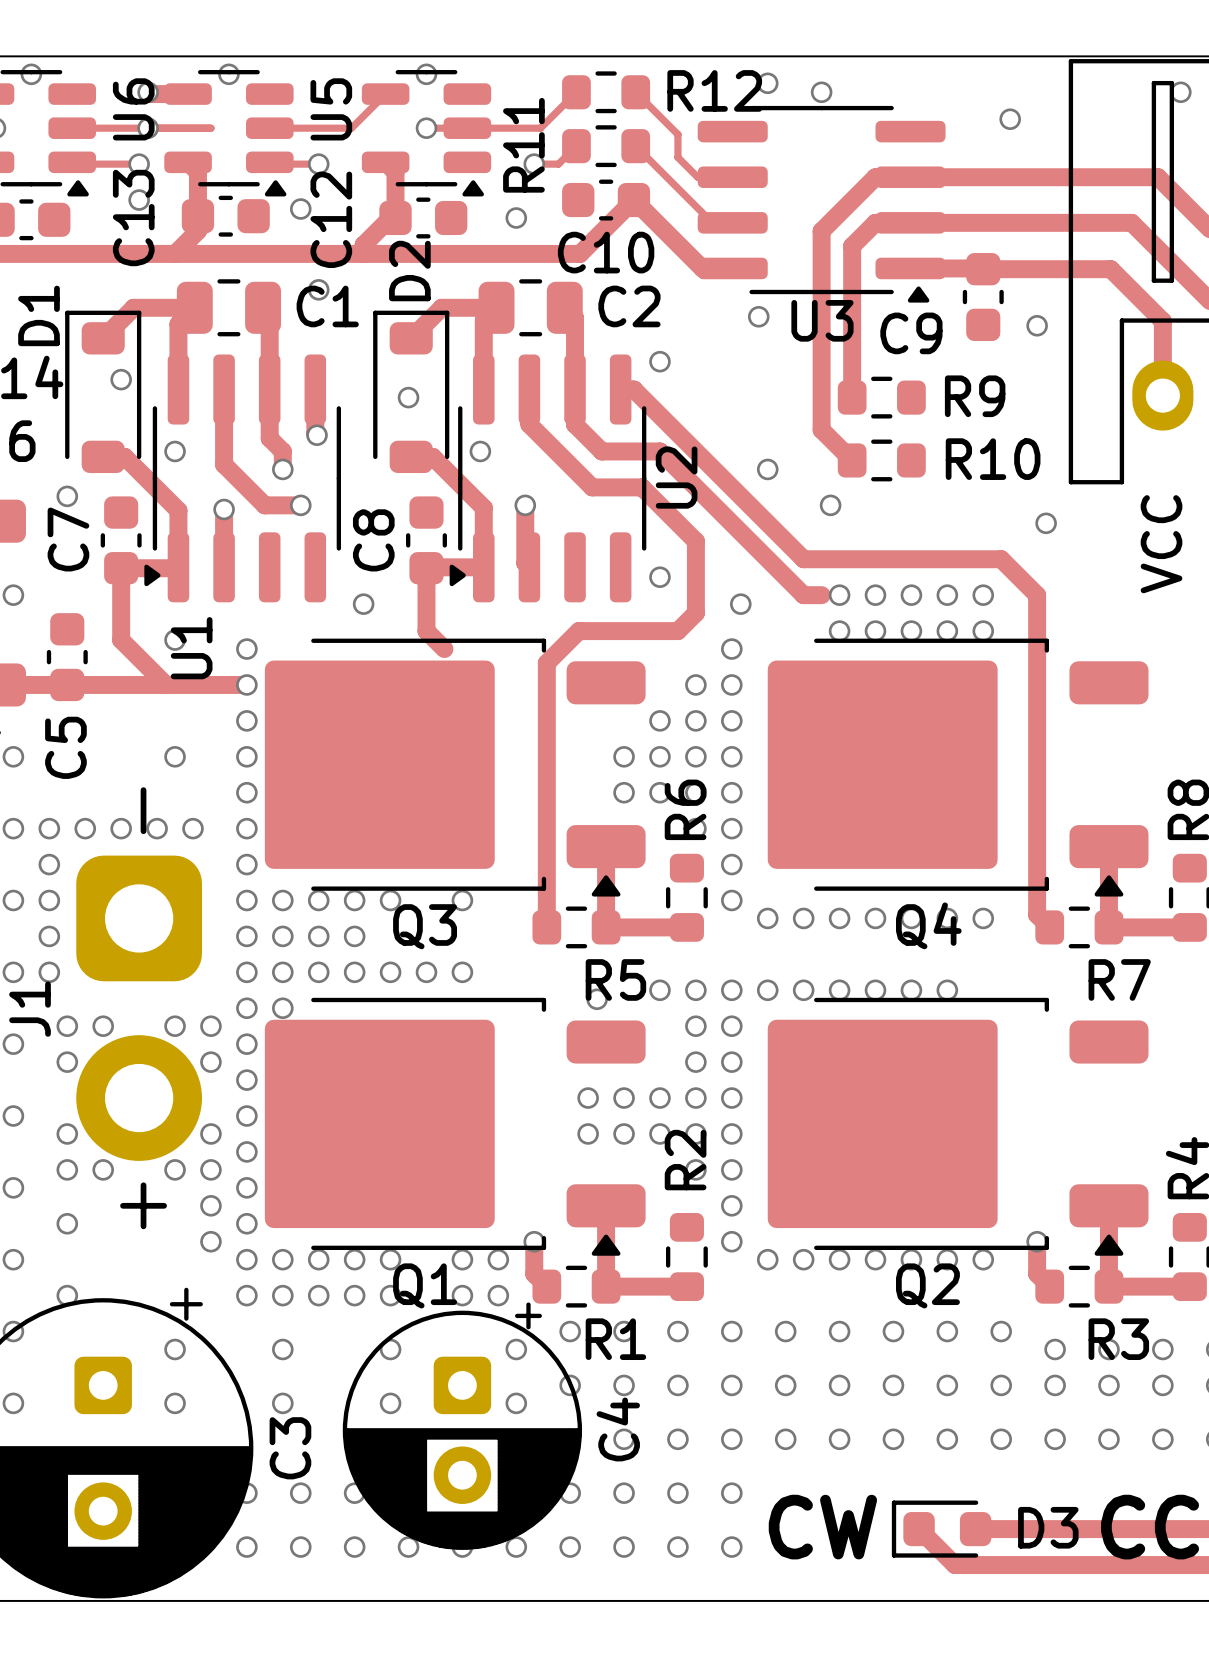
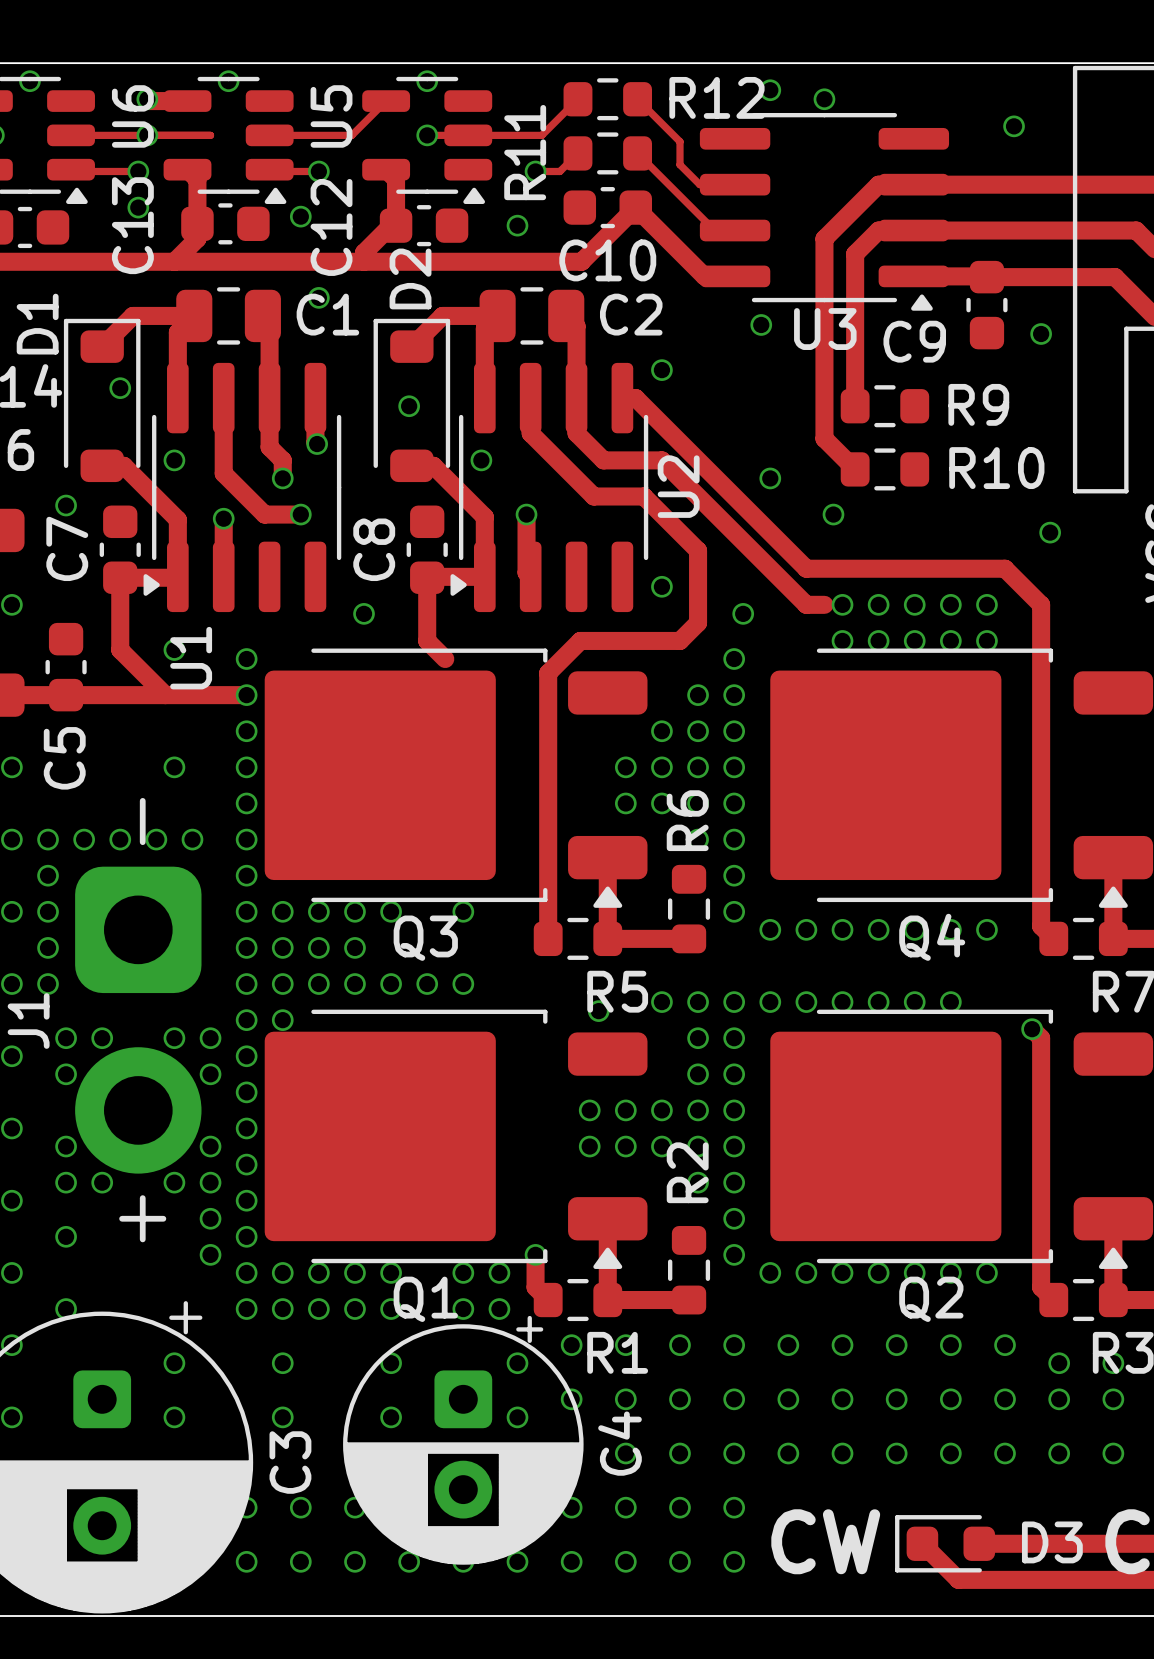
track: none -> (1032, 1029) (1041, 1038) (1041, 1254)
via: none -> (1032, 1029)
via: (1037, 1241) -> none

